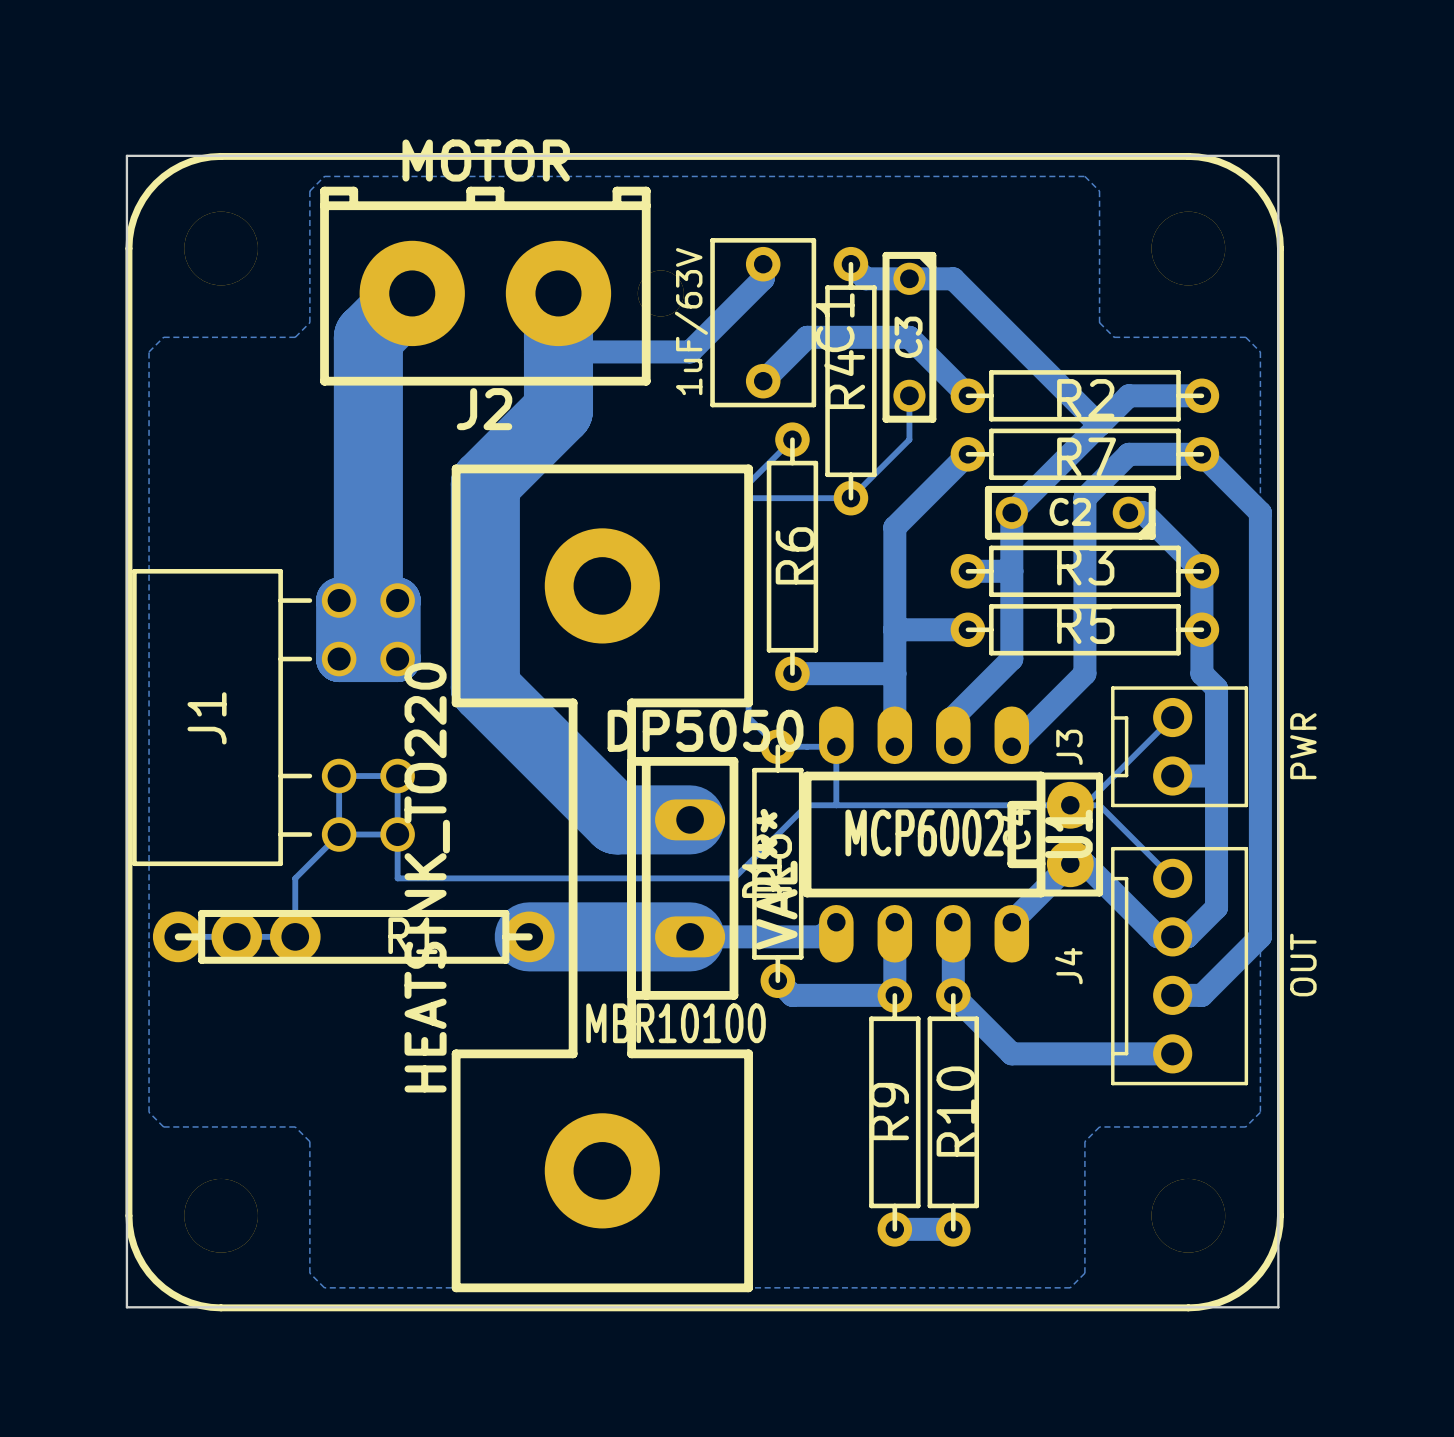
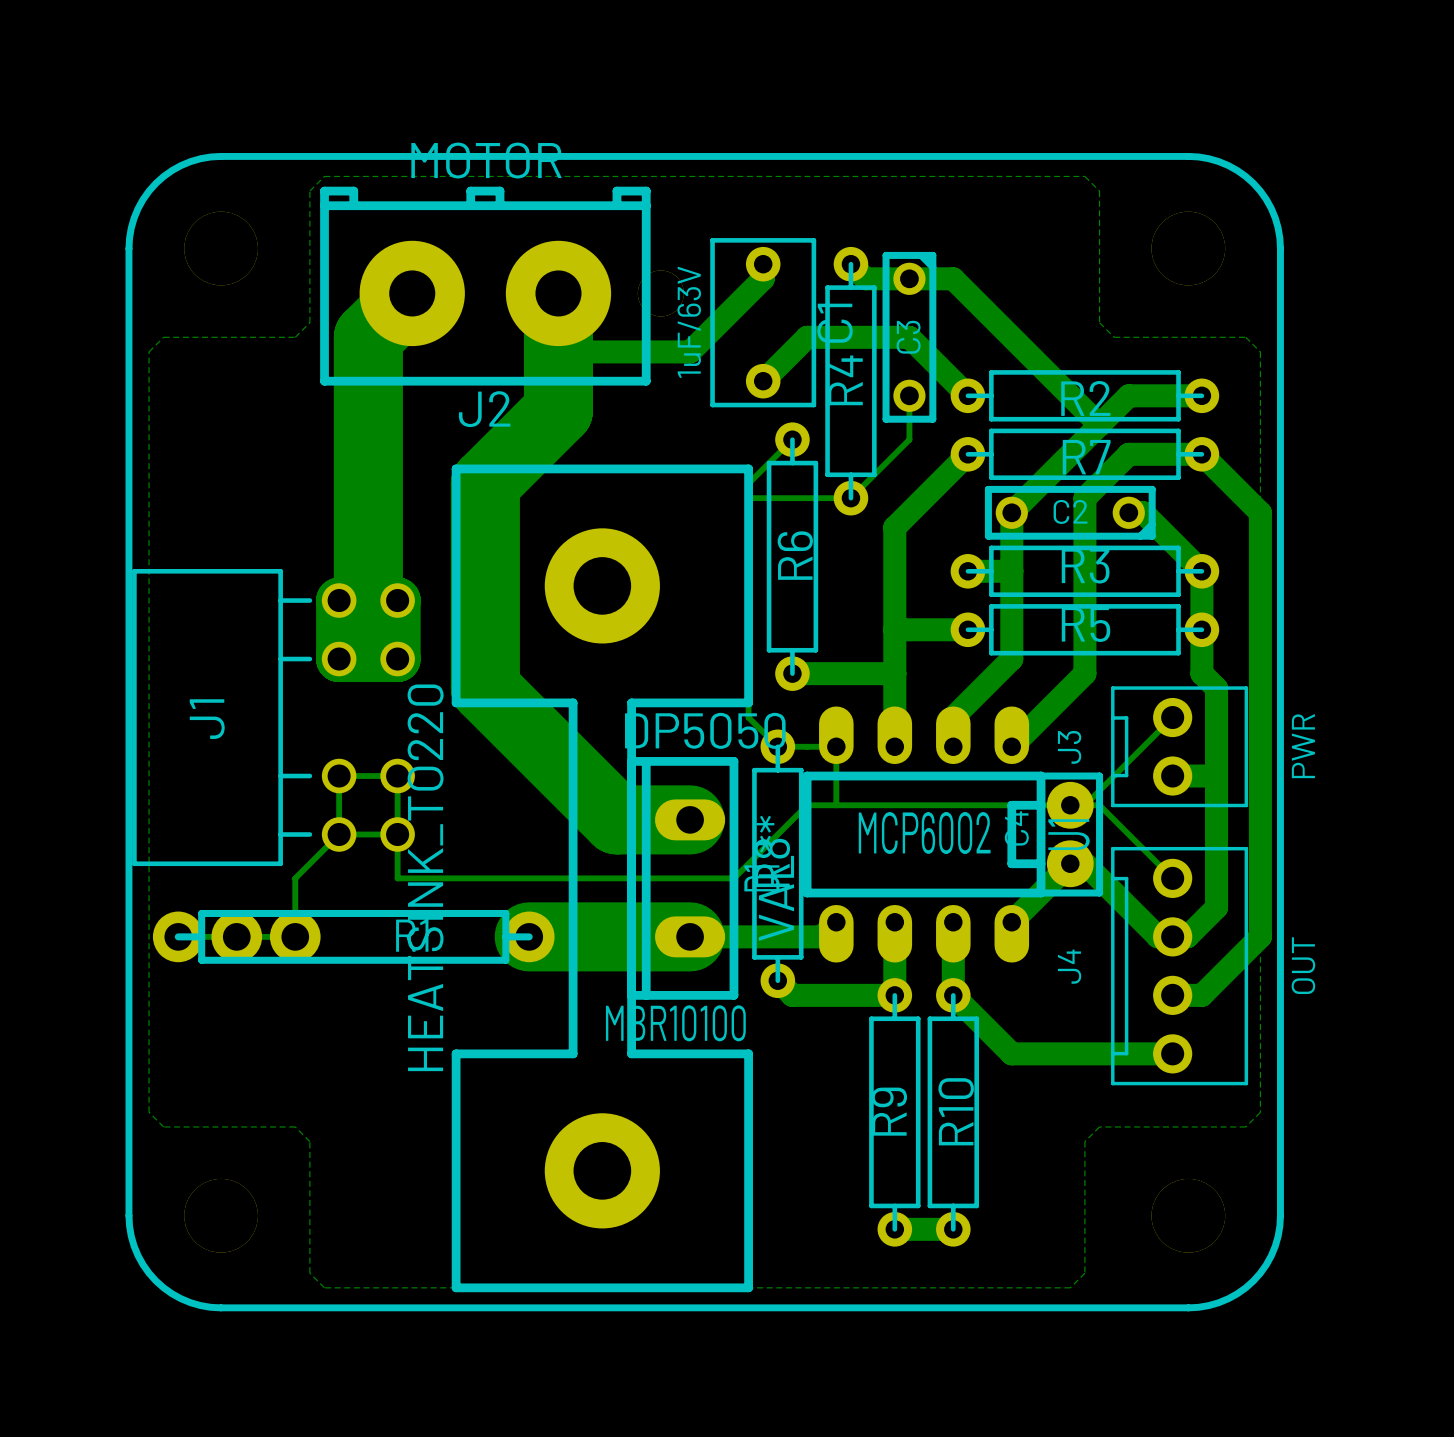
board edge: (126, 155) (126, 1307) (1278, 1307) (1278, 155) (126, 155) -> none

